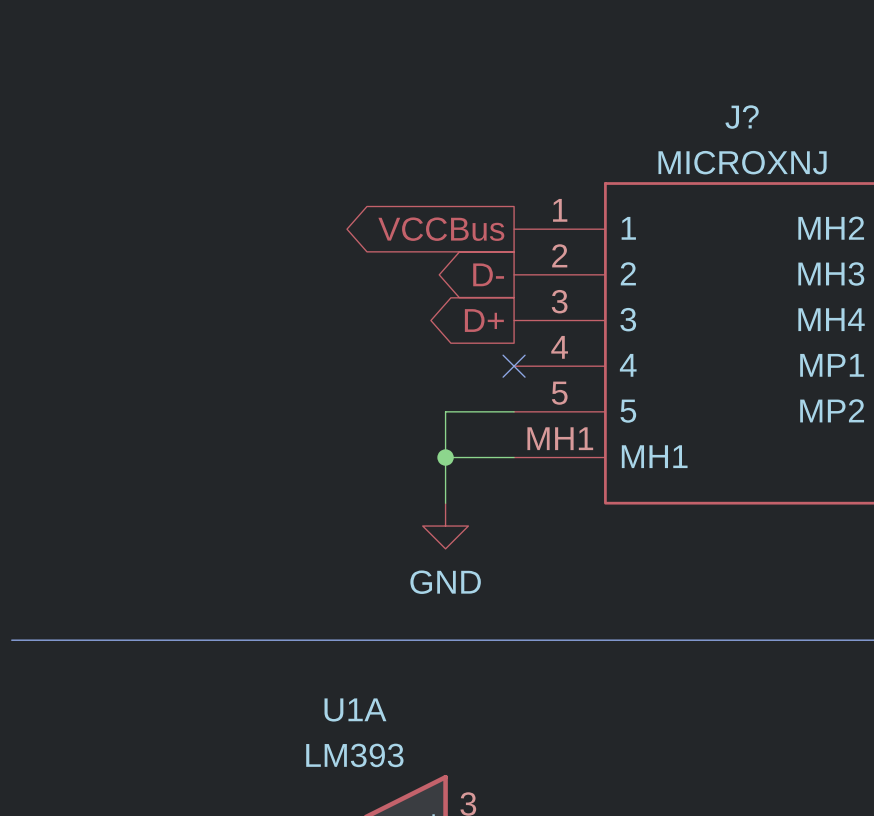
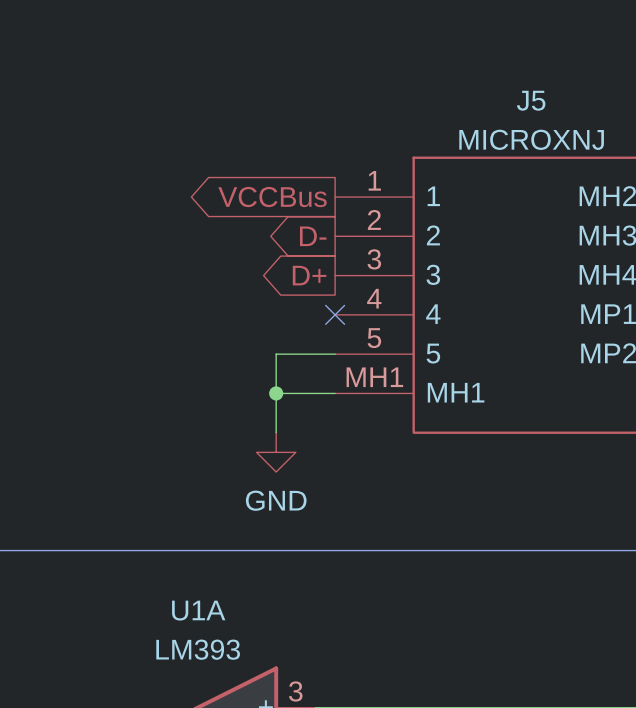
J? name: J? (742, 117) -> J5 (531, 100)

